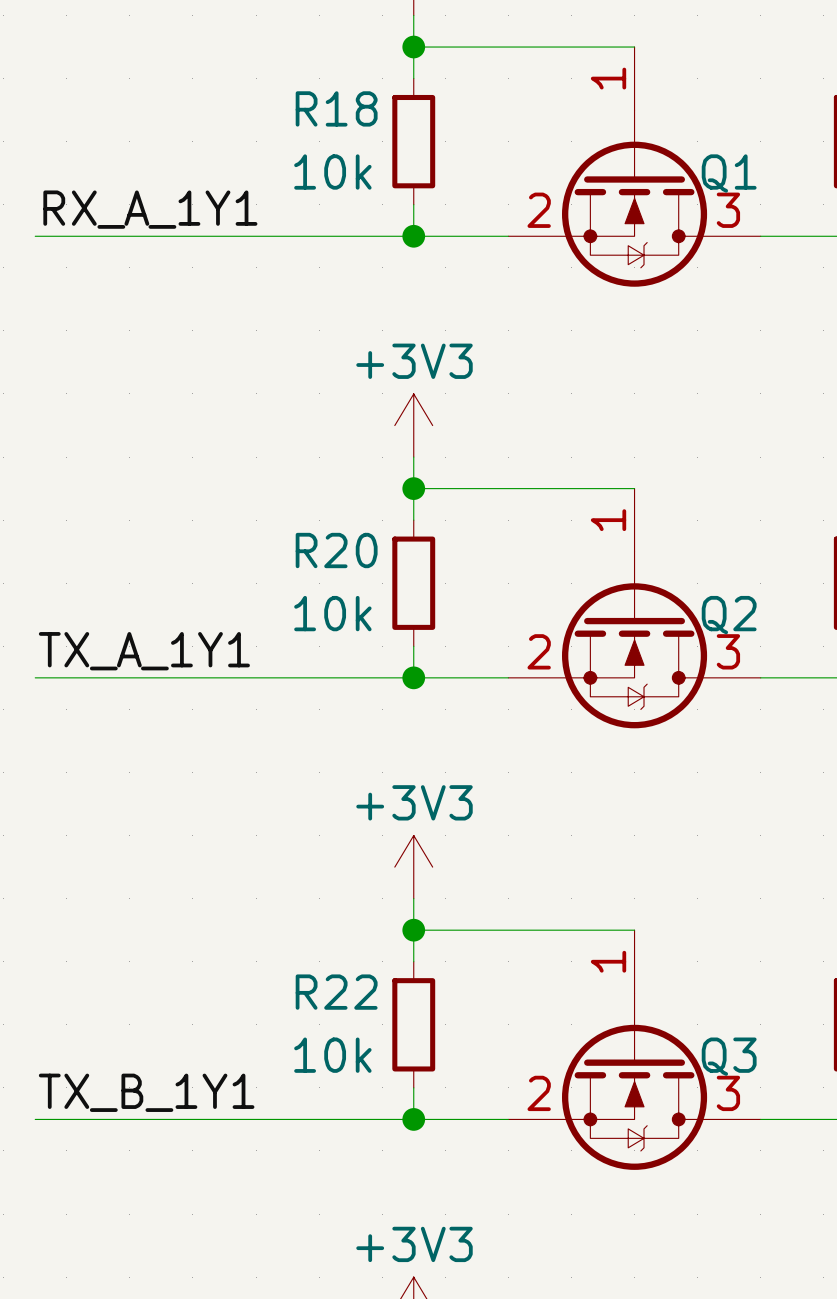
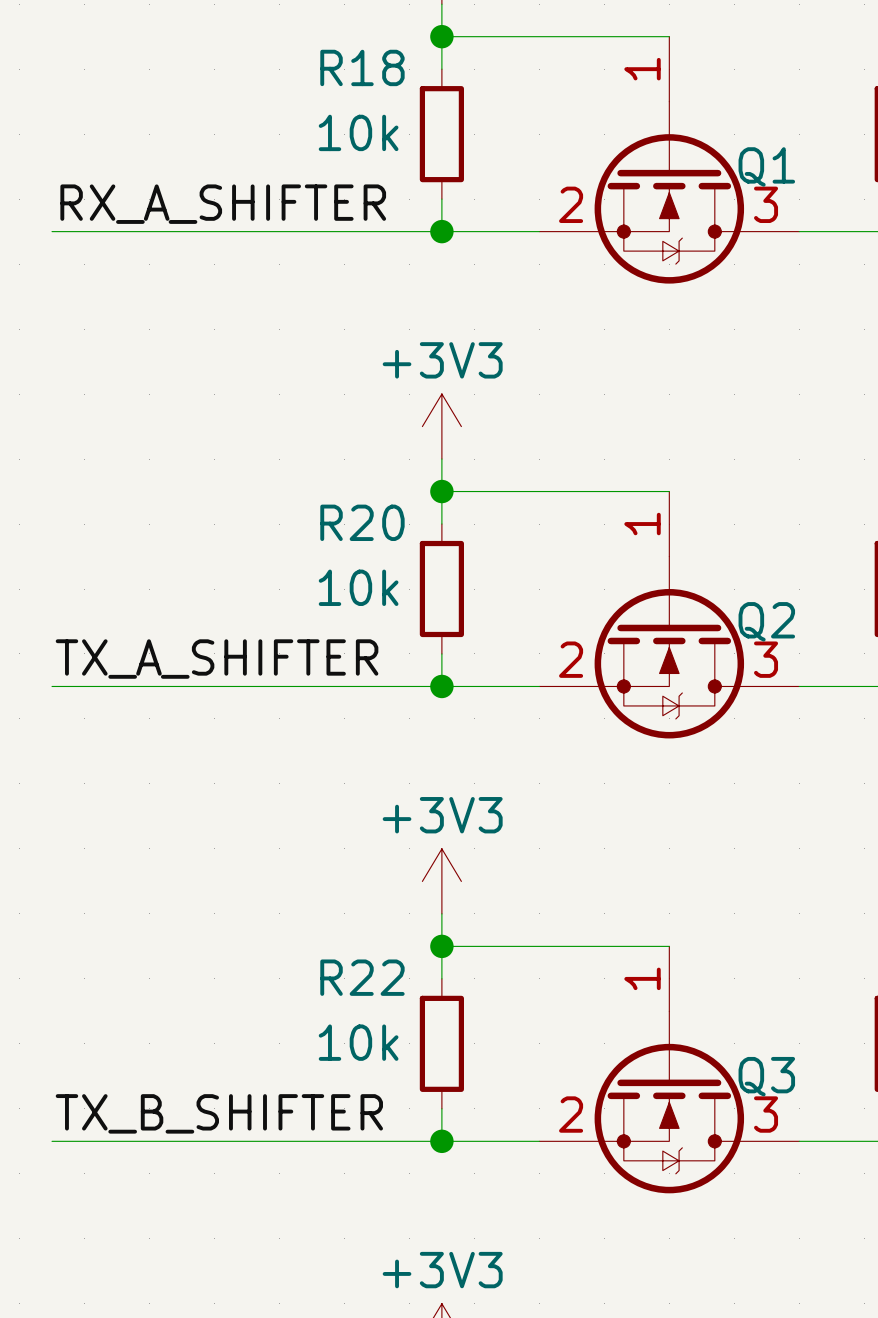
R18 name position: R18 (336, 108) -> R18 (362, 67)
R18 value position: 10k (332, 172) -> 10k (358, 132)
label: RX_A_1Y1 (150, 209) -> RX_A_SHIFTER (223, 204)
R20 name position: R20 (336, 550) -> R20 (362, 522)
R20 value position: 10k (332, 613) -> 10k (358, 587)
label: TX_A_1Y1 (144, 651) -> TX_A_SHIFTER (217, 659)
R22 name position: R22 (336, 992) -> R22 (362, 977)
R22 value position: 10k (332, 1055) -> 10k (358, 1042)
label: TX_B_1Y1 (146, 1092) -> TX_B_SHIFTER (219, 1113)

